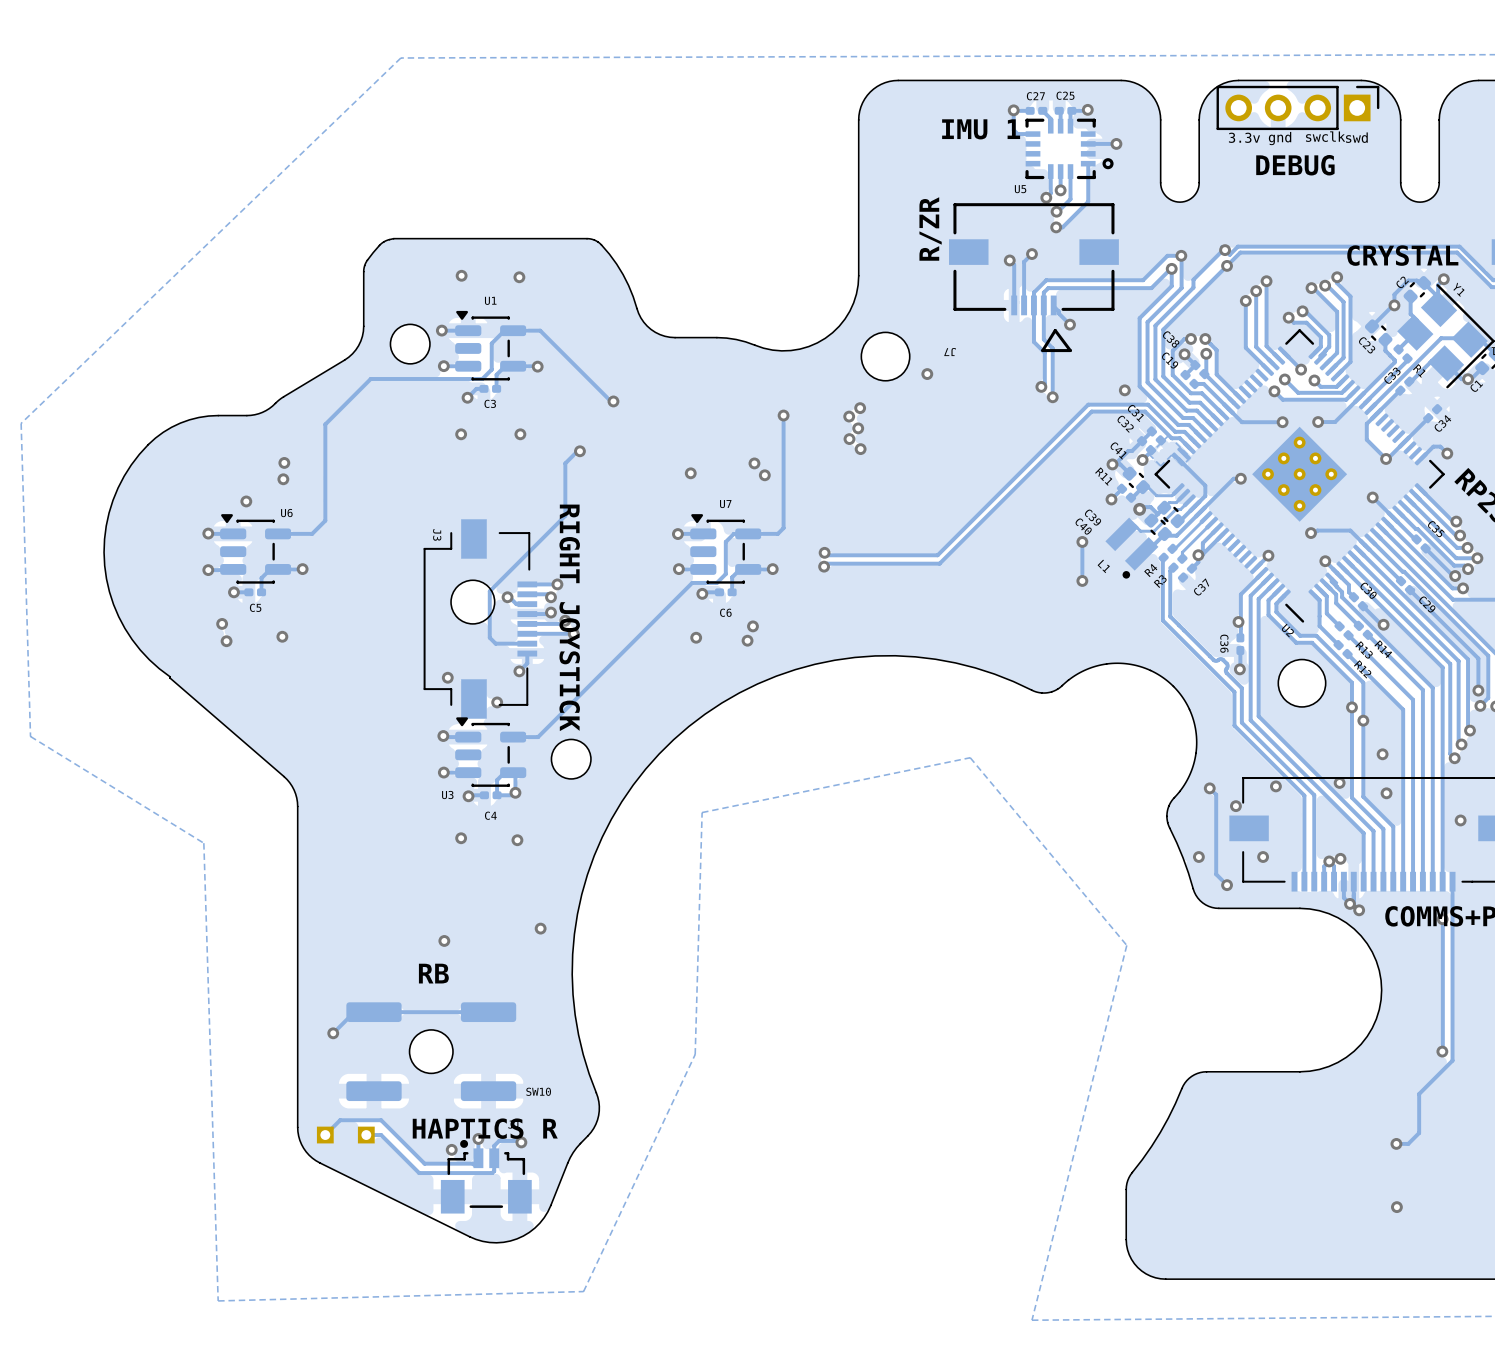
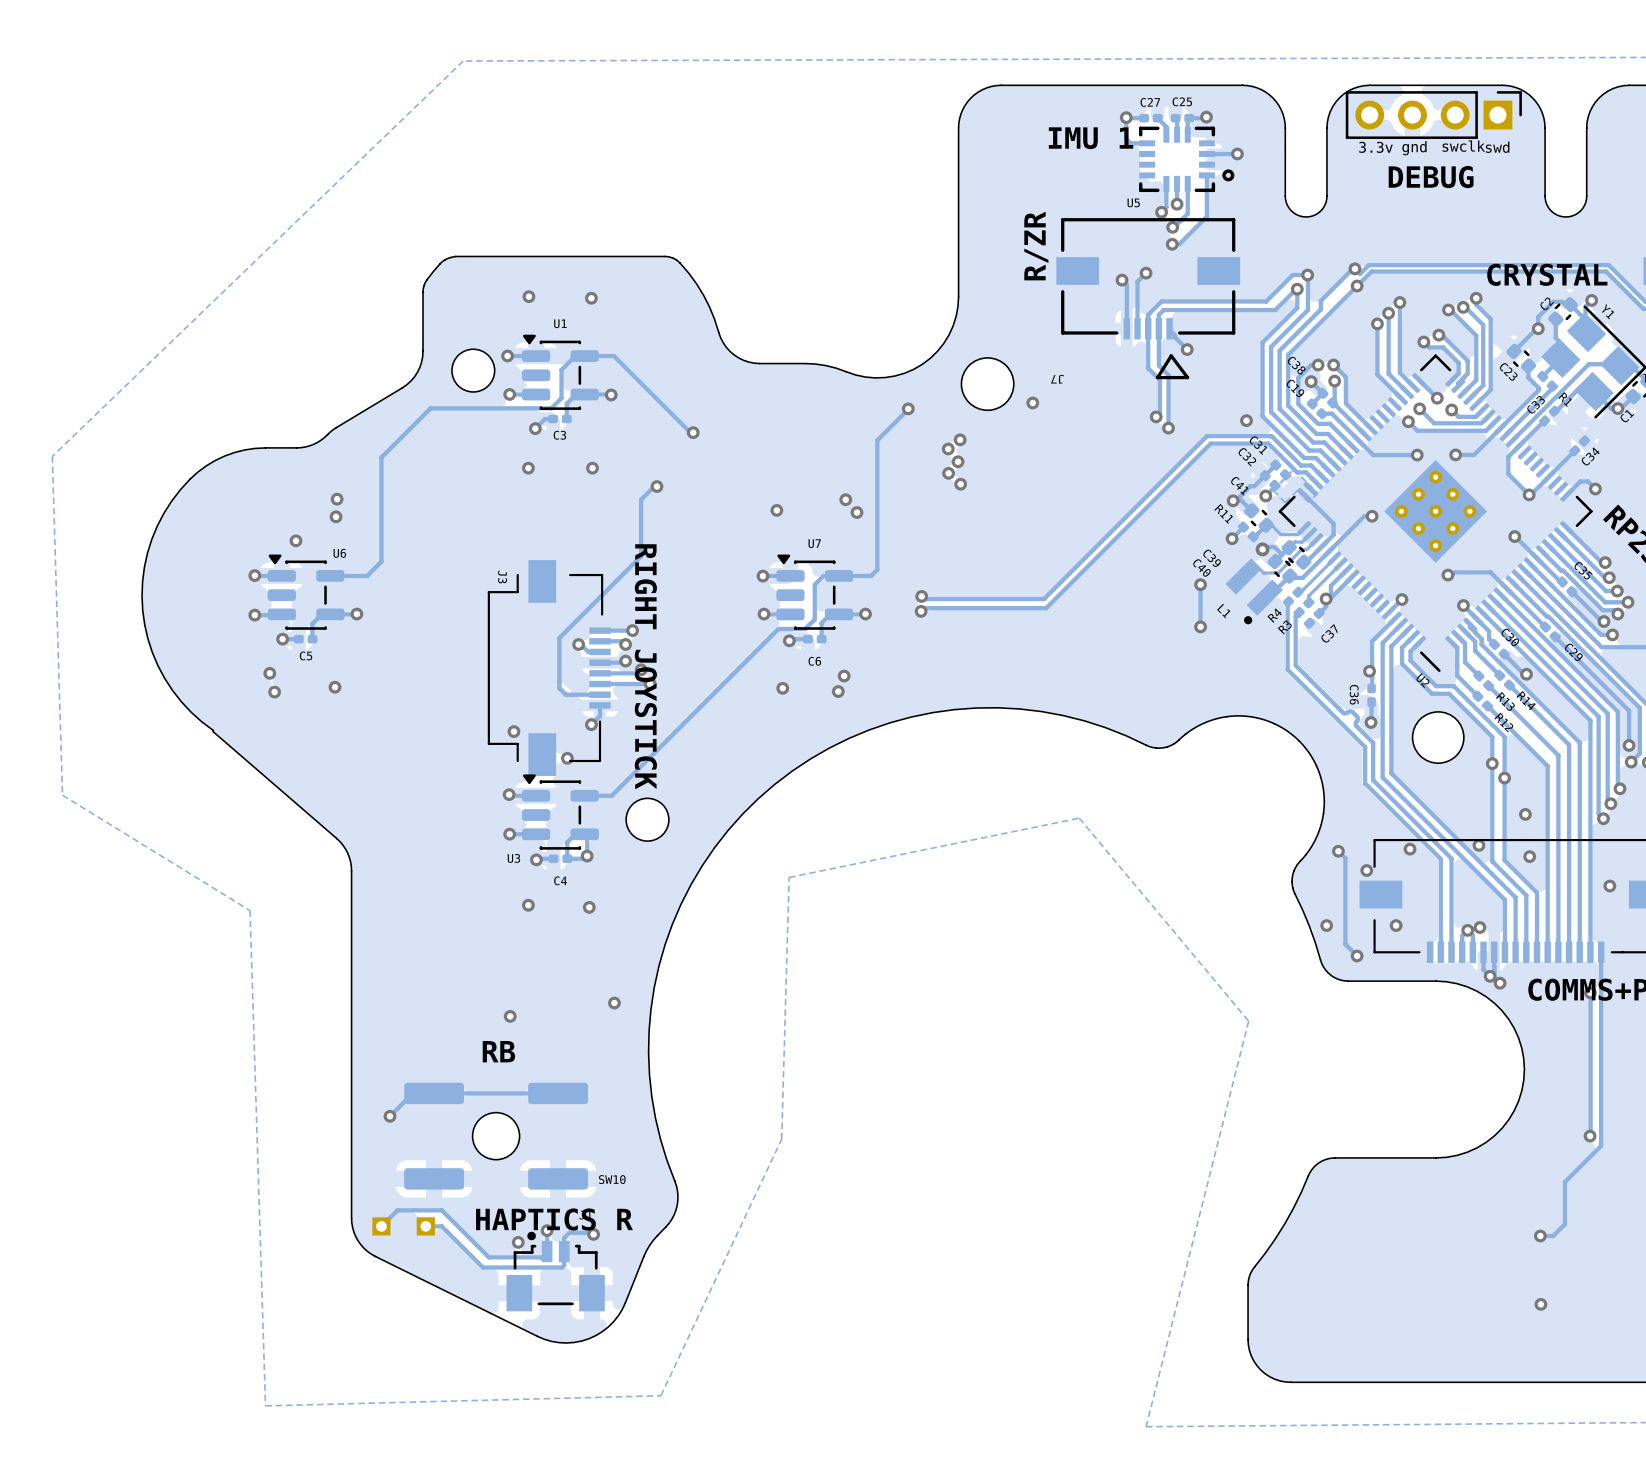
track: none -> (908, 408) (877, 440) (877, 447)
via position: (783, 415) -> (908, 408)
round board edge: [450, 580, 495, 625] -> none

